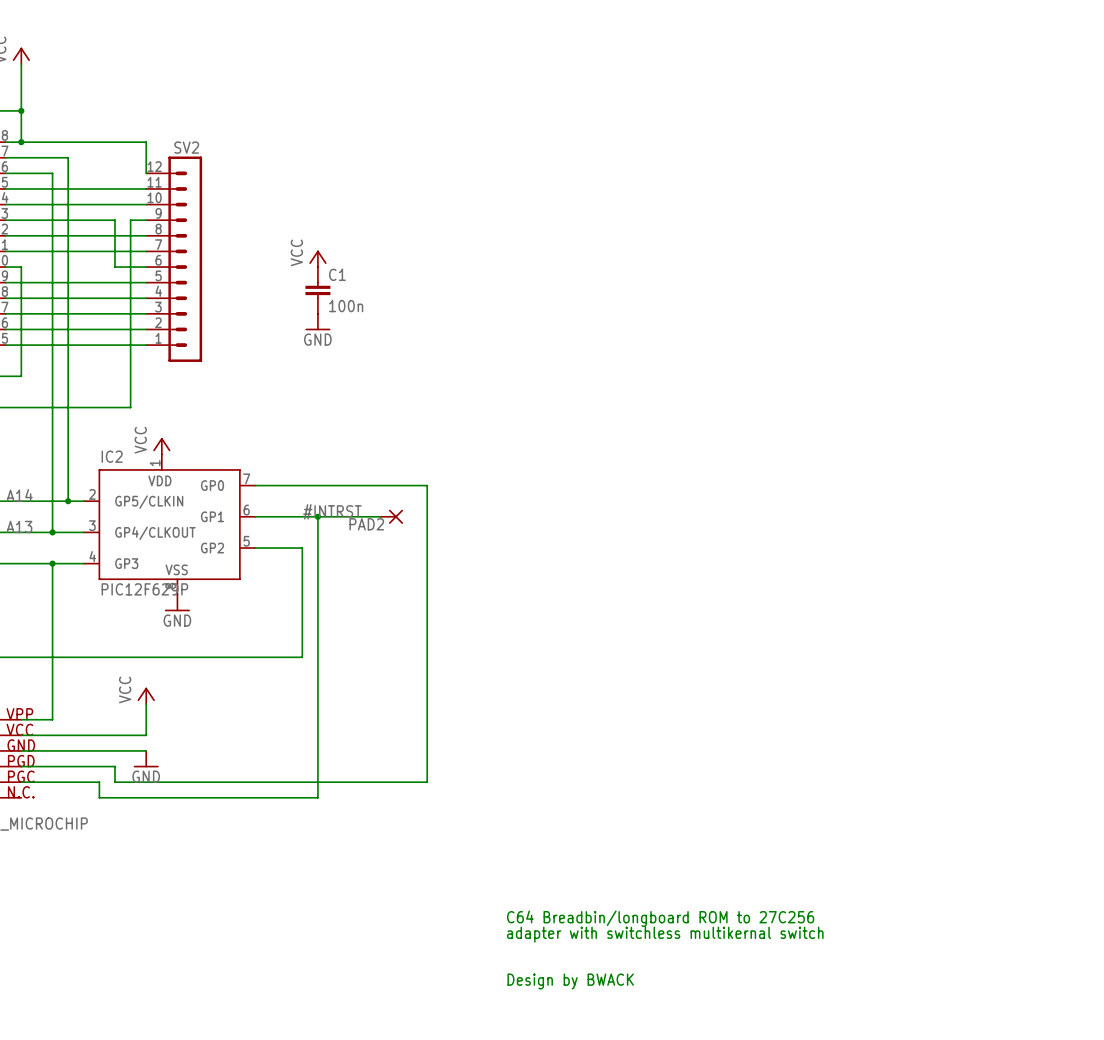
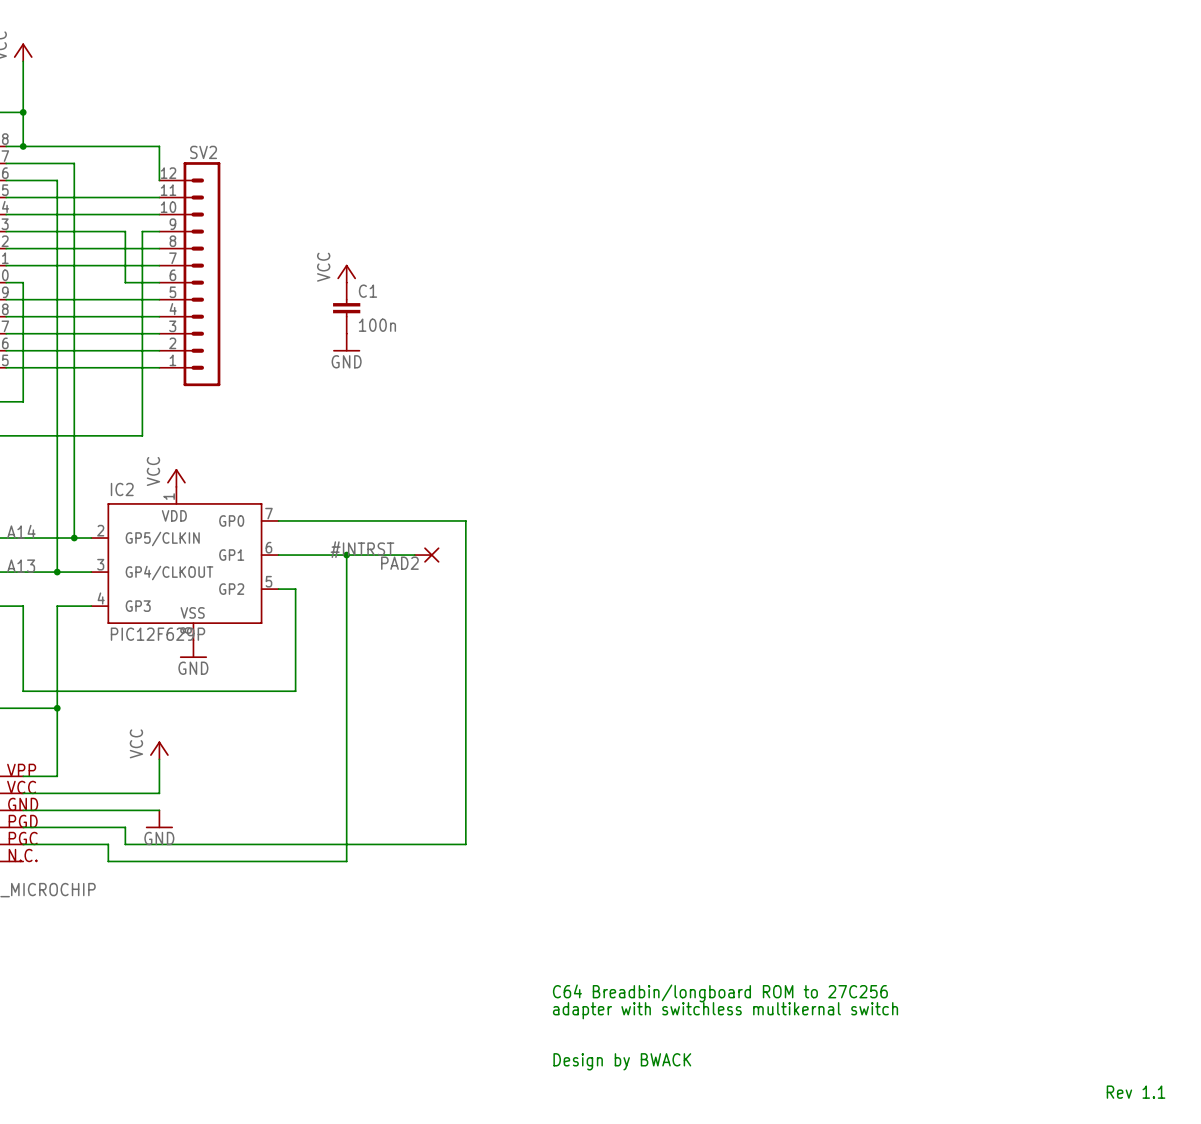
wire: (271, 548) (302, 548) (302, 657) (52, 657) -> (295, 589) (295, 691) (23, 691) (23, 606)
wire: (21, 563) (52, 563) -> none
junction: (52, 563) -> none
junction: none -> (57, 708)
text: none -> Rev 1.1 (1136, 1092)

